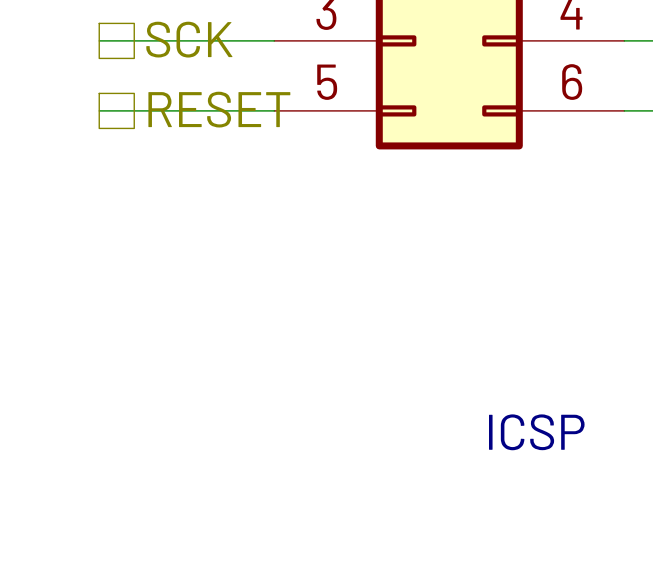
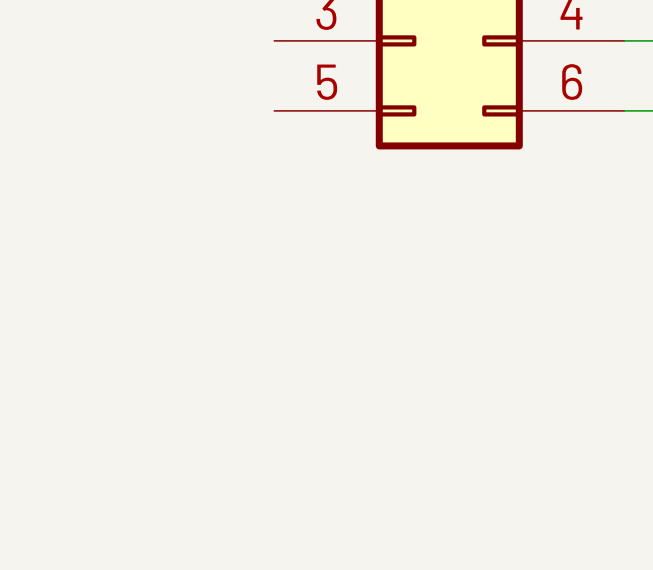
hierarchical label: SCK (189, 39) -> none
wire: (99, 40) (274, 40) -> none
hierarchical label: RESET (219, 109) -> none
wire: (99, 110) (274, 110) -> none
text: ICSP (536, 432) -> none

